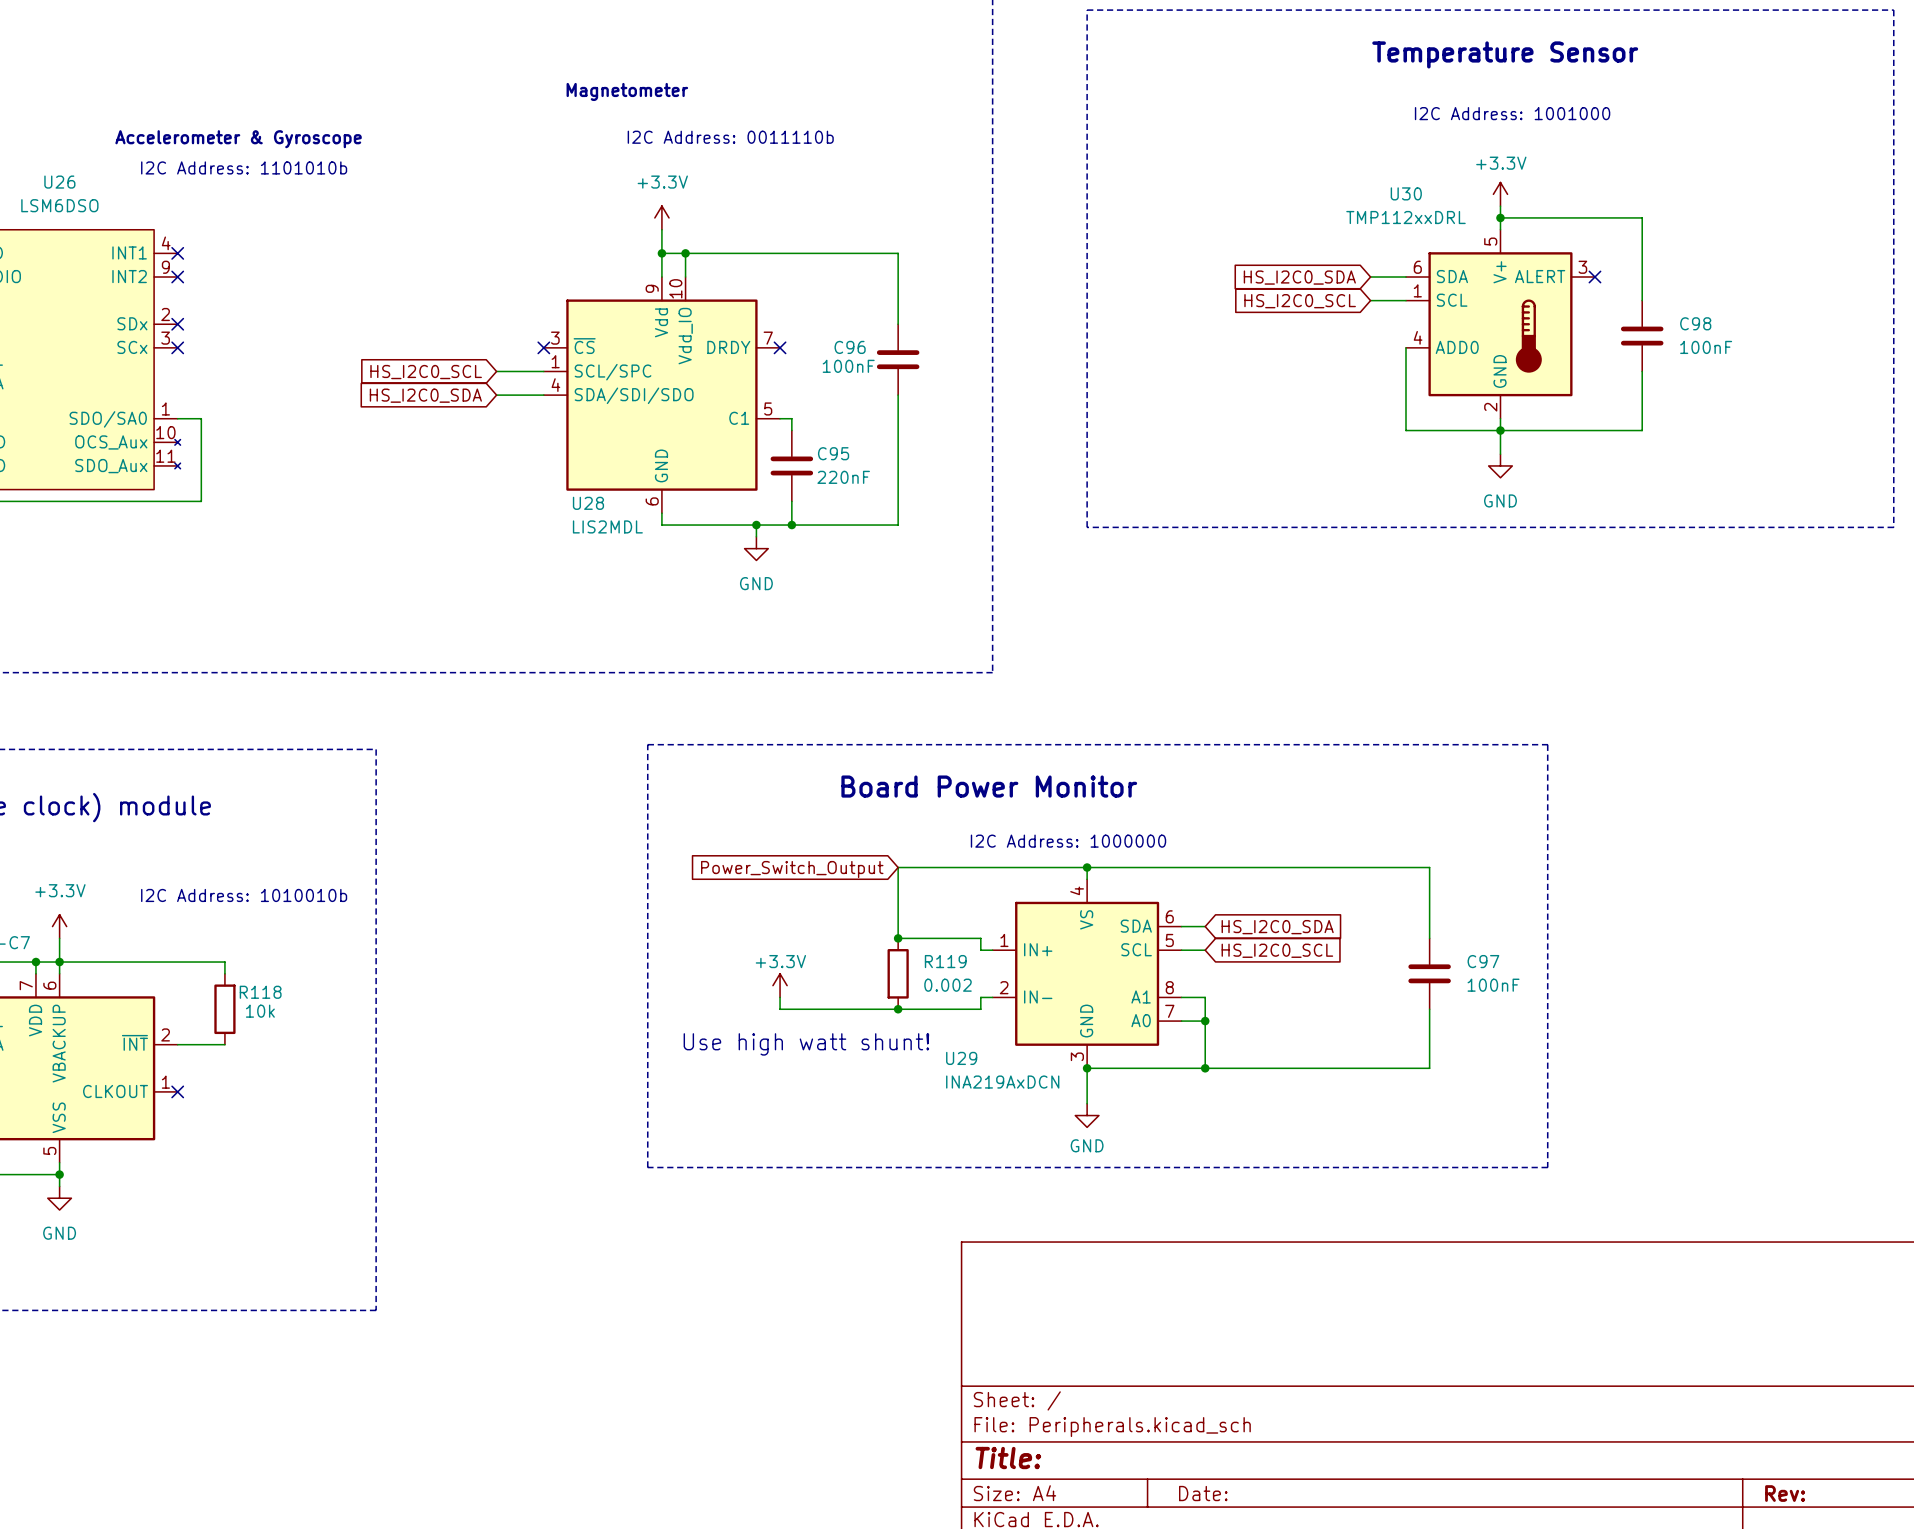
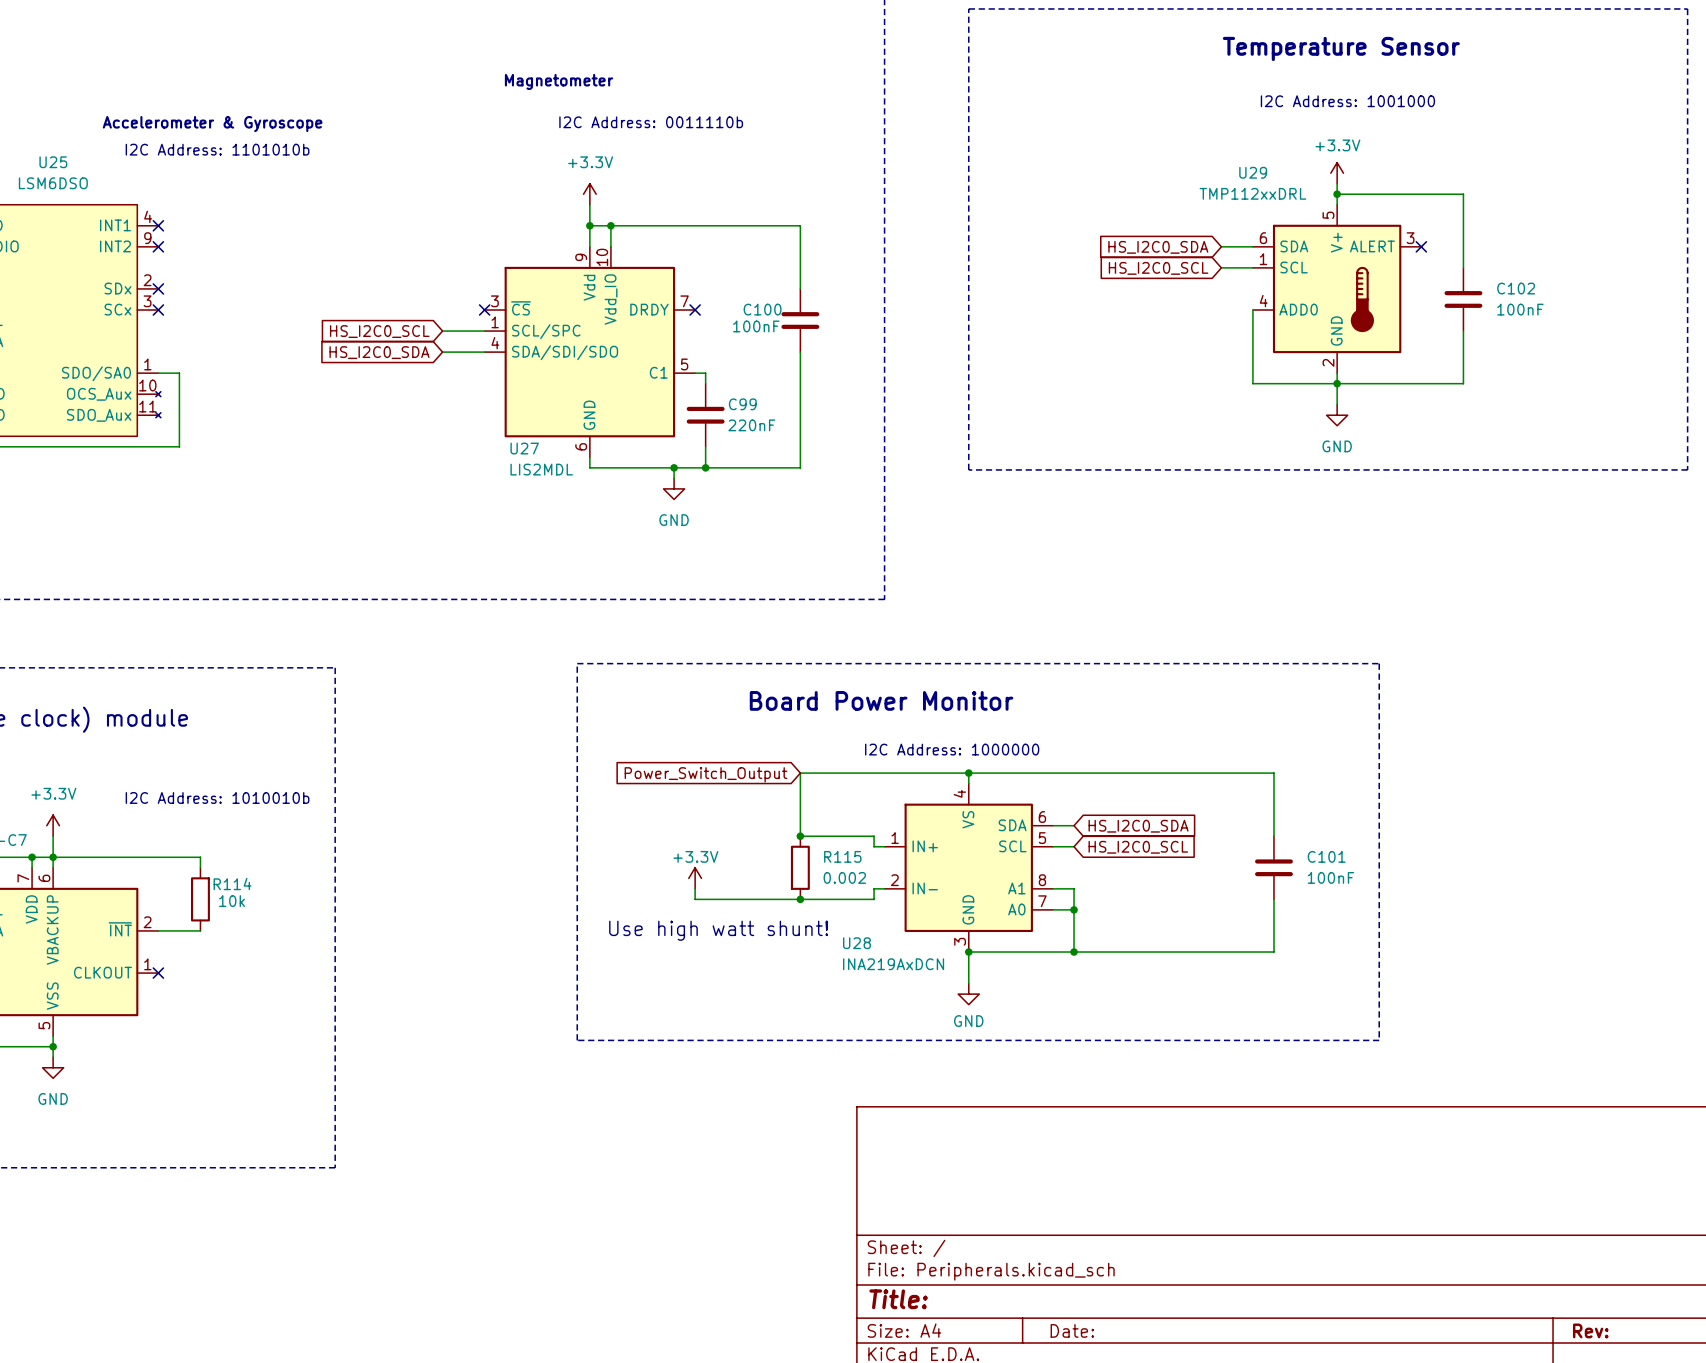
U26 name: U26 (59, 182) -> U25 (53, 162)
U30 name: U30 (1406, 193) -> U29 (1253, 172)
C98 name: C98 (1695, 323) -> C102 (1516, 288)
C96 name: C96 (850, 347) -> C100 (762, 309)
C95 name: C95 (833, 453) -> C99 (742, 404)
U28 name: U28 (588, 503) -> U27 (524, 448)
R119 name: R119 (945, 961) -> R115 (842, 856)
C97 name: C97 (1483, 961) -> C101 (1326, 856)
R118 name: R118 (260, 992) -> R114 (232, 884)
U29 name: U29 (961, 1058) -> U28 (856, 943)

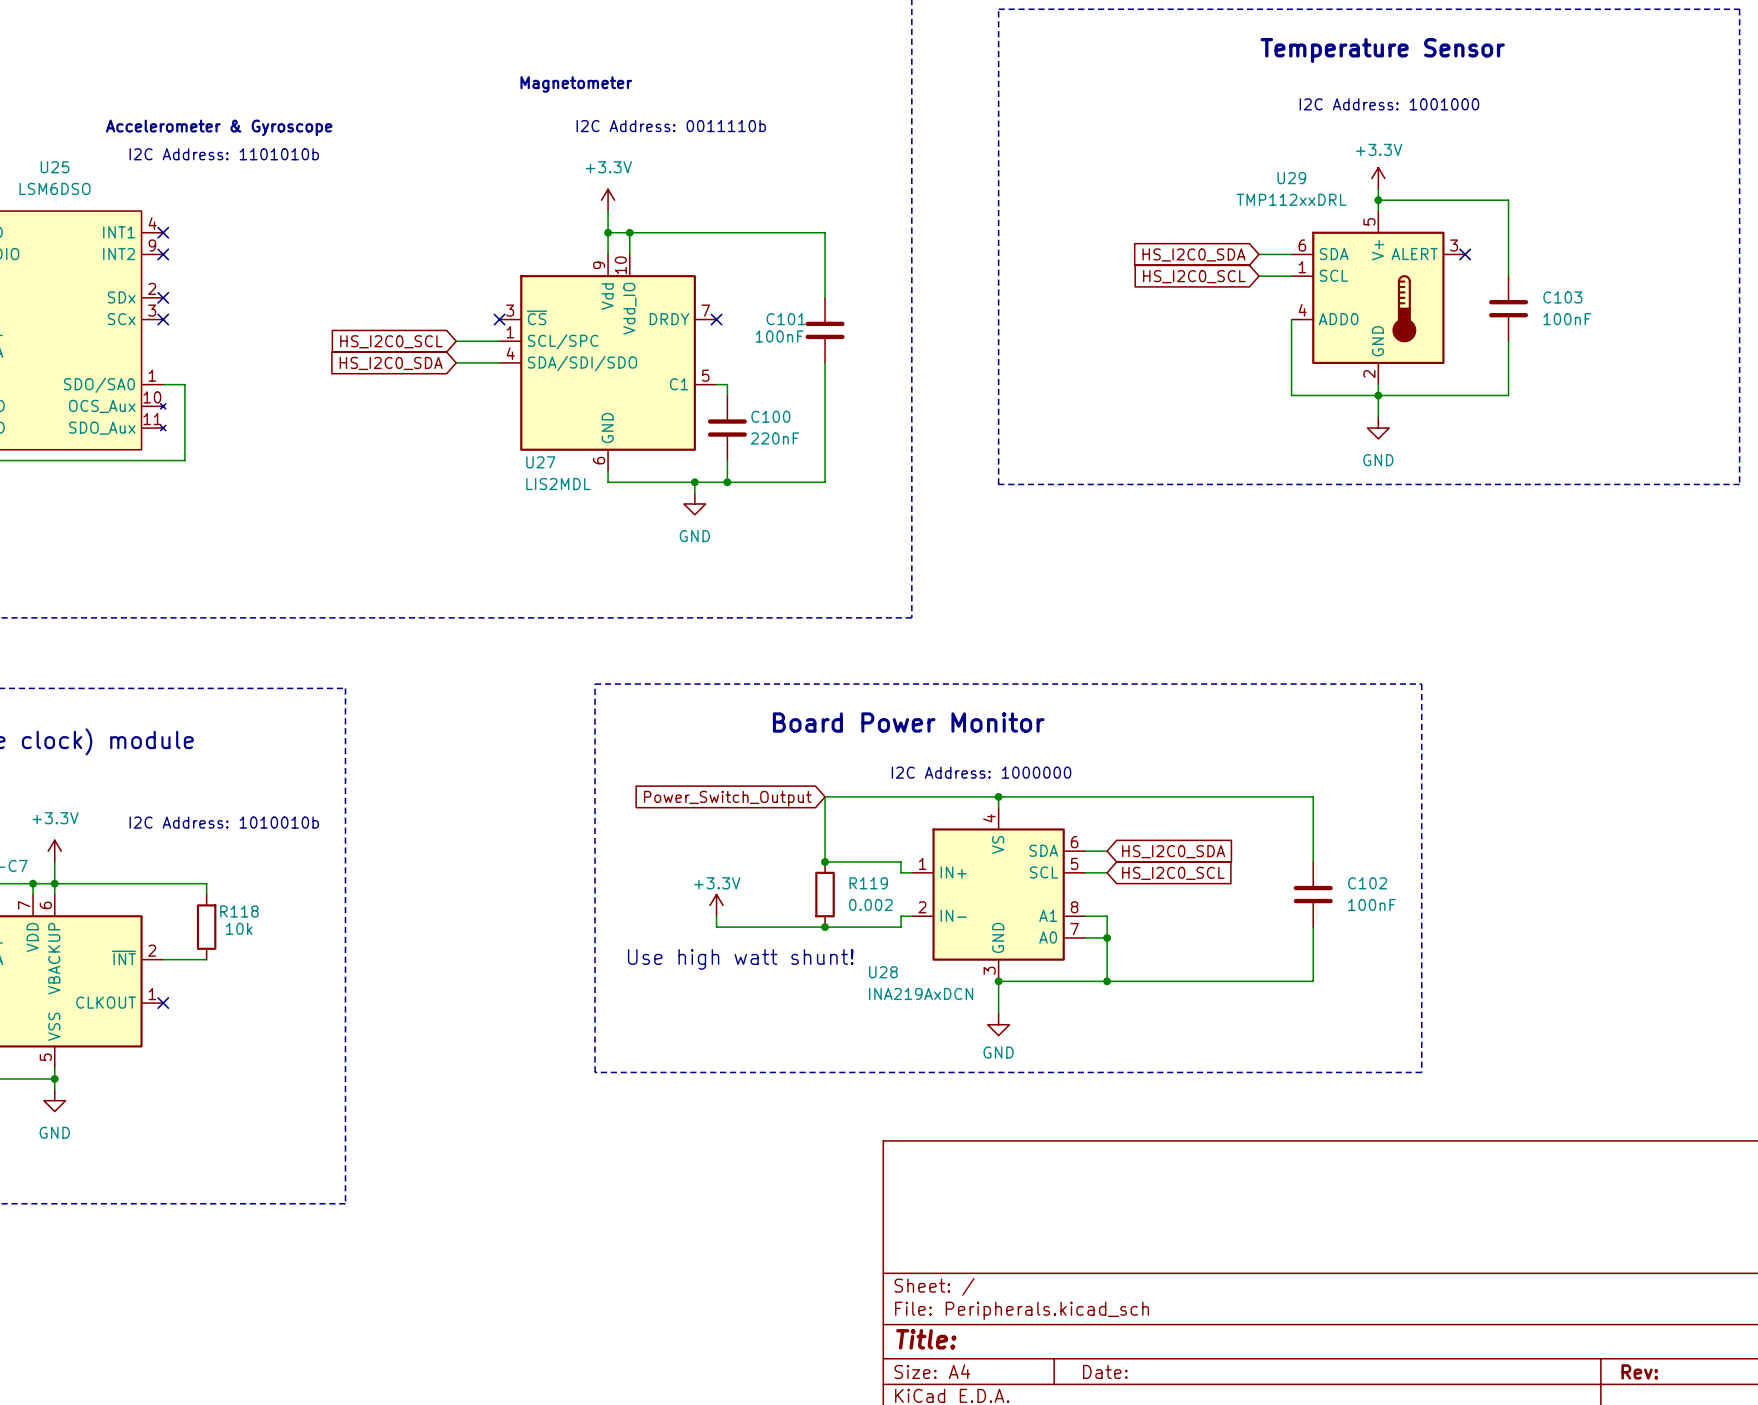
C102 name: C102 (1516, 288) -> C103 (1562, 297)
C100 name: C100 (762, 309) -> C101 (786, 319)
C99 name: C99 (742, 404) -> C100 (770, 416)
R115 name: R115 (842, 856) -> R119 (868, 883)
C101 name: C101 (1326, 856) -> C102 (1367, 883)
R114 name: R114 (232, 884) -> R118 (239, 911)

